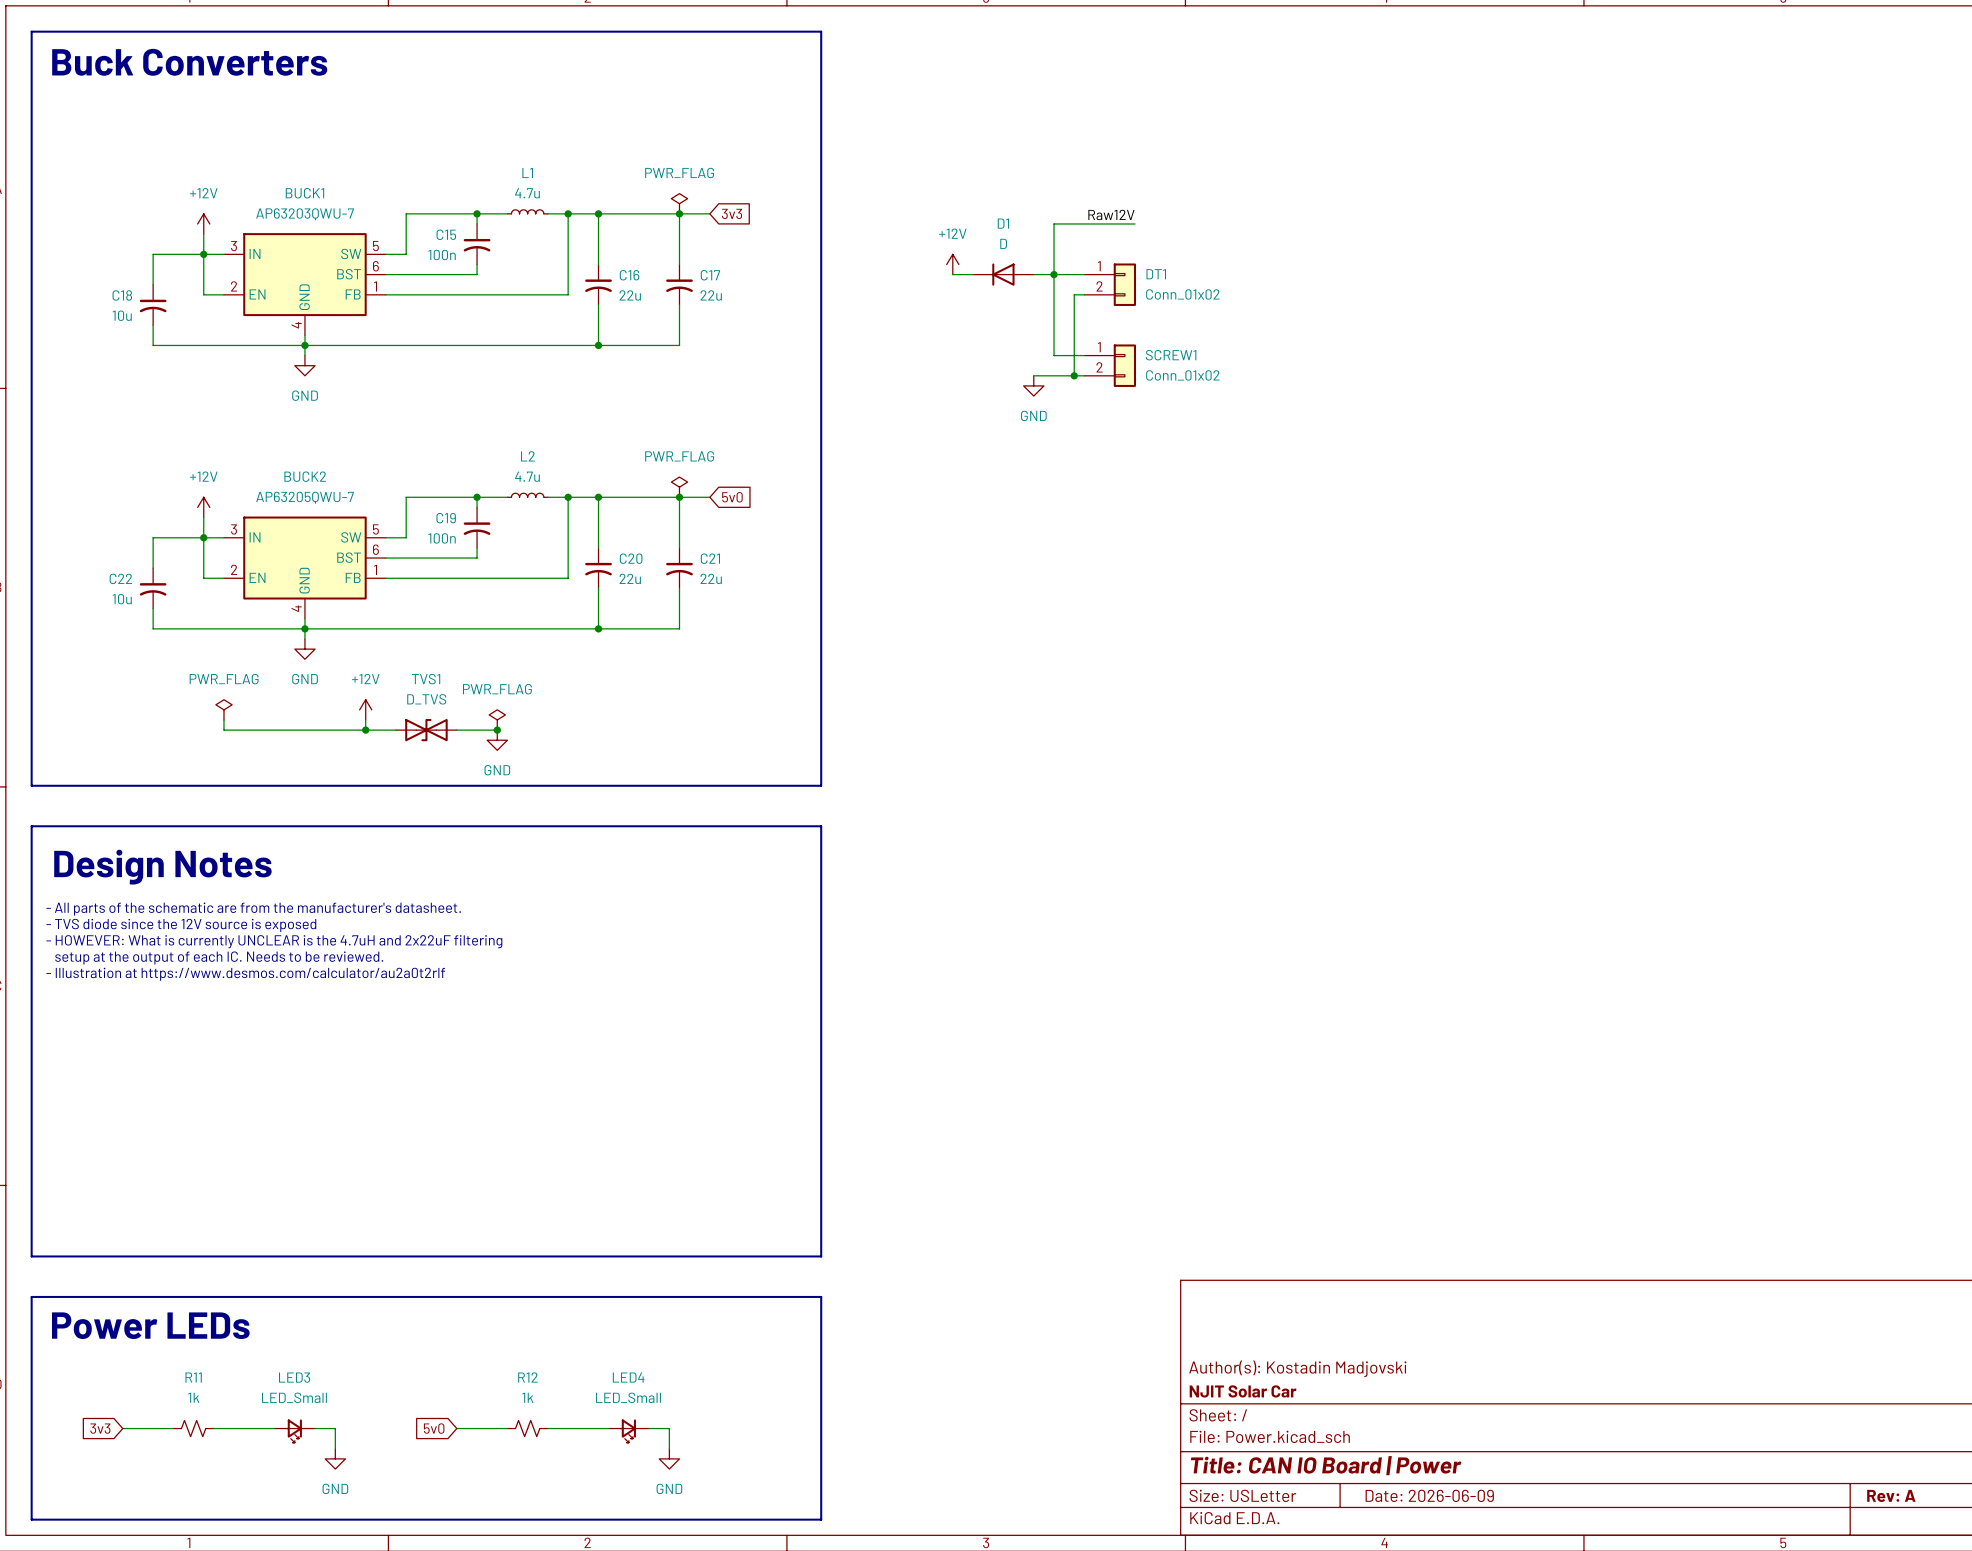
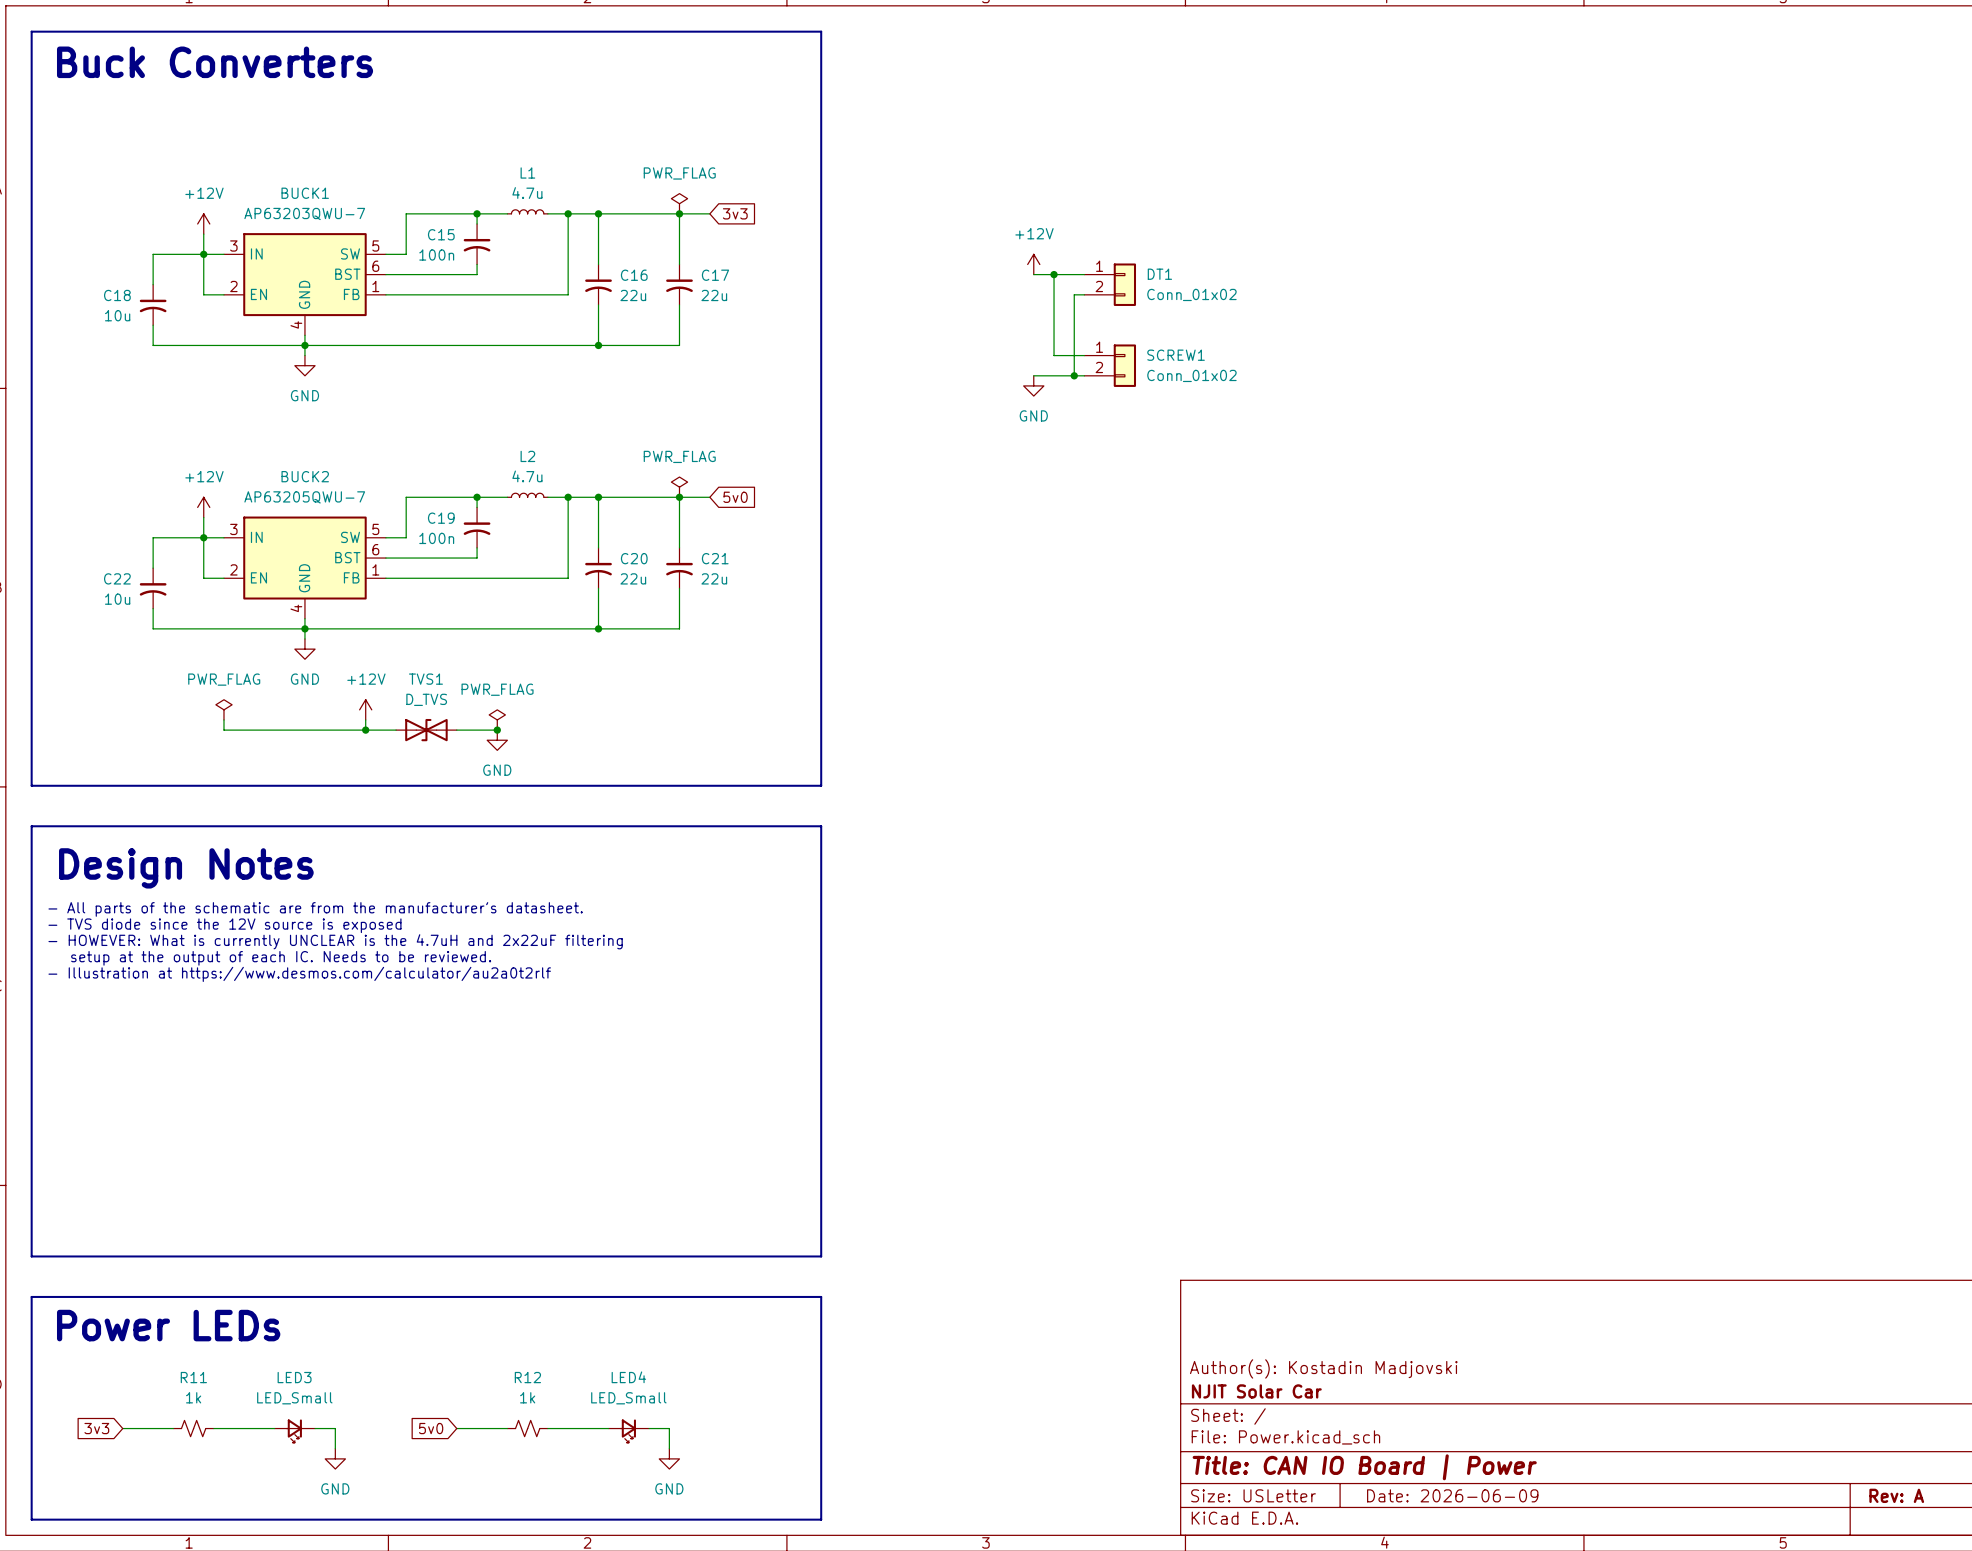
label: Raw12V (1111, 214) -> none
wire: (1134, 223) (1054, 223) (1054, 274) -> none
power symbol position: +12V (952, 264) -> +12V (1033, 264)
wire: (952, 274) (973, 274) -> none
D1: D (1003, 274) -> none

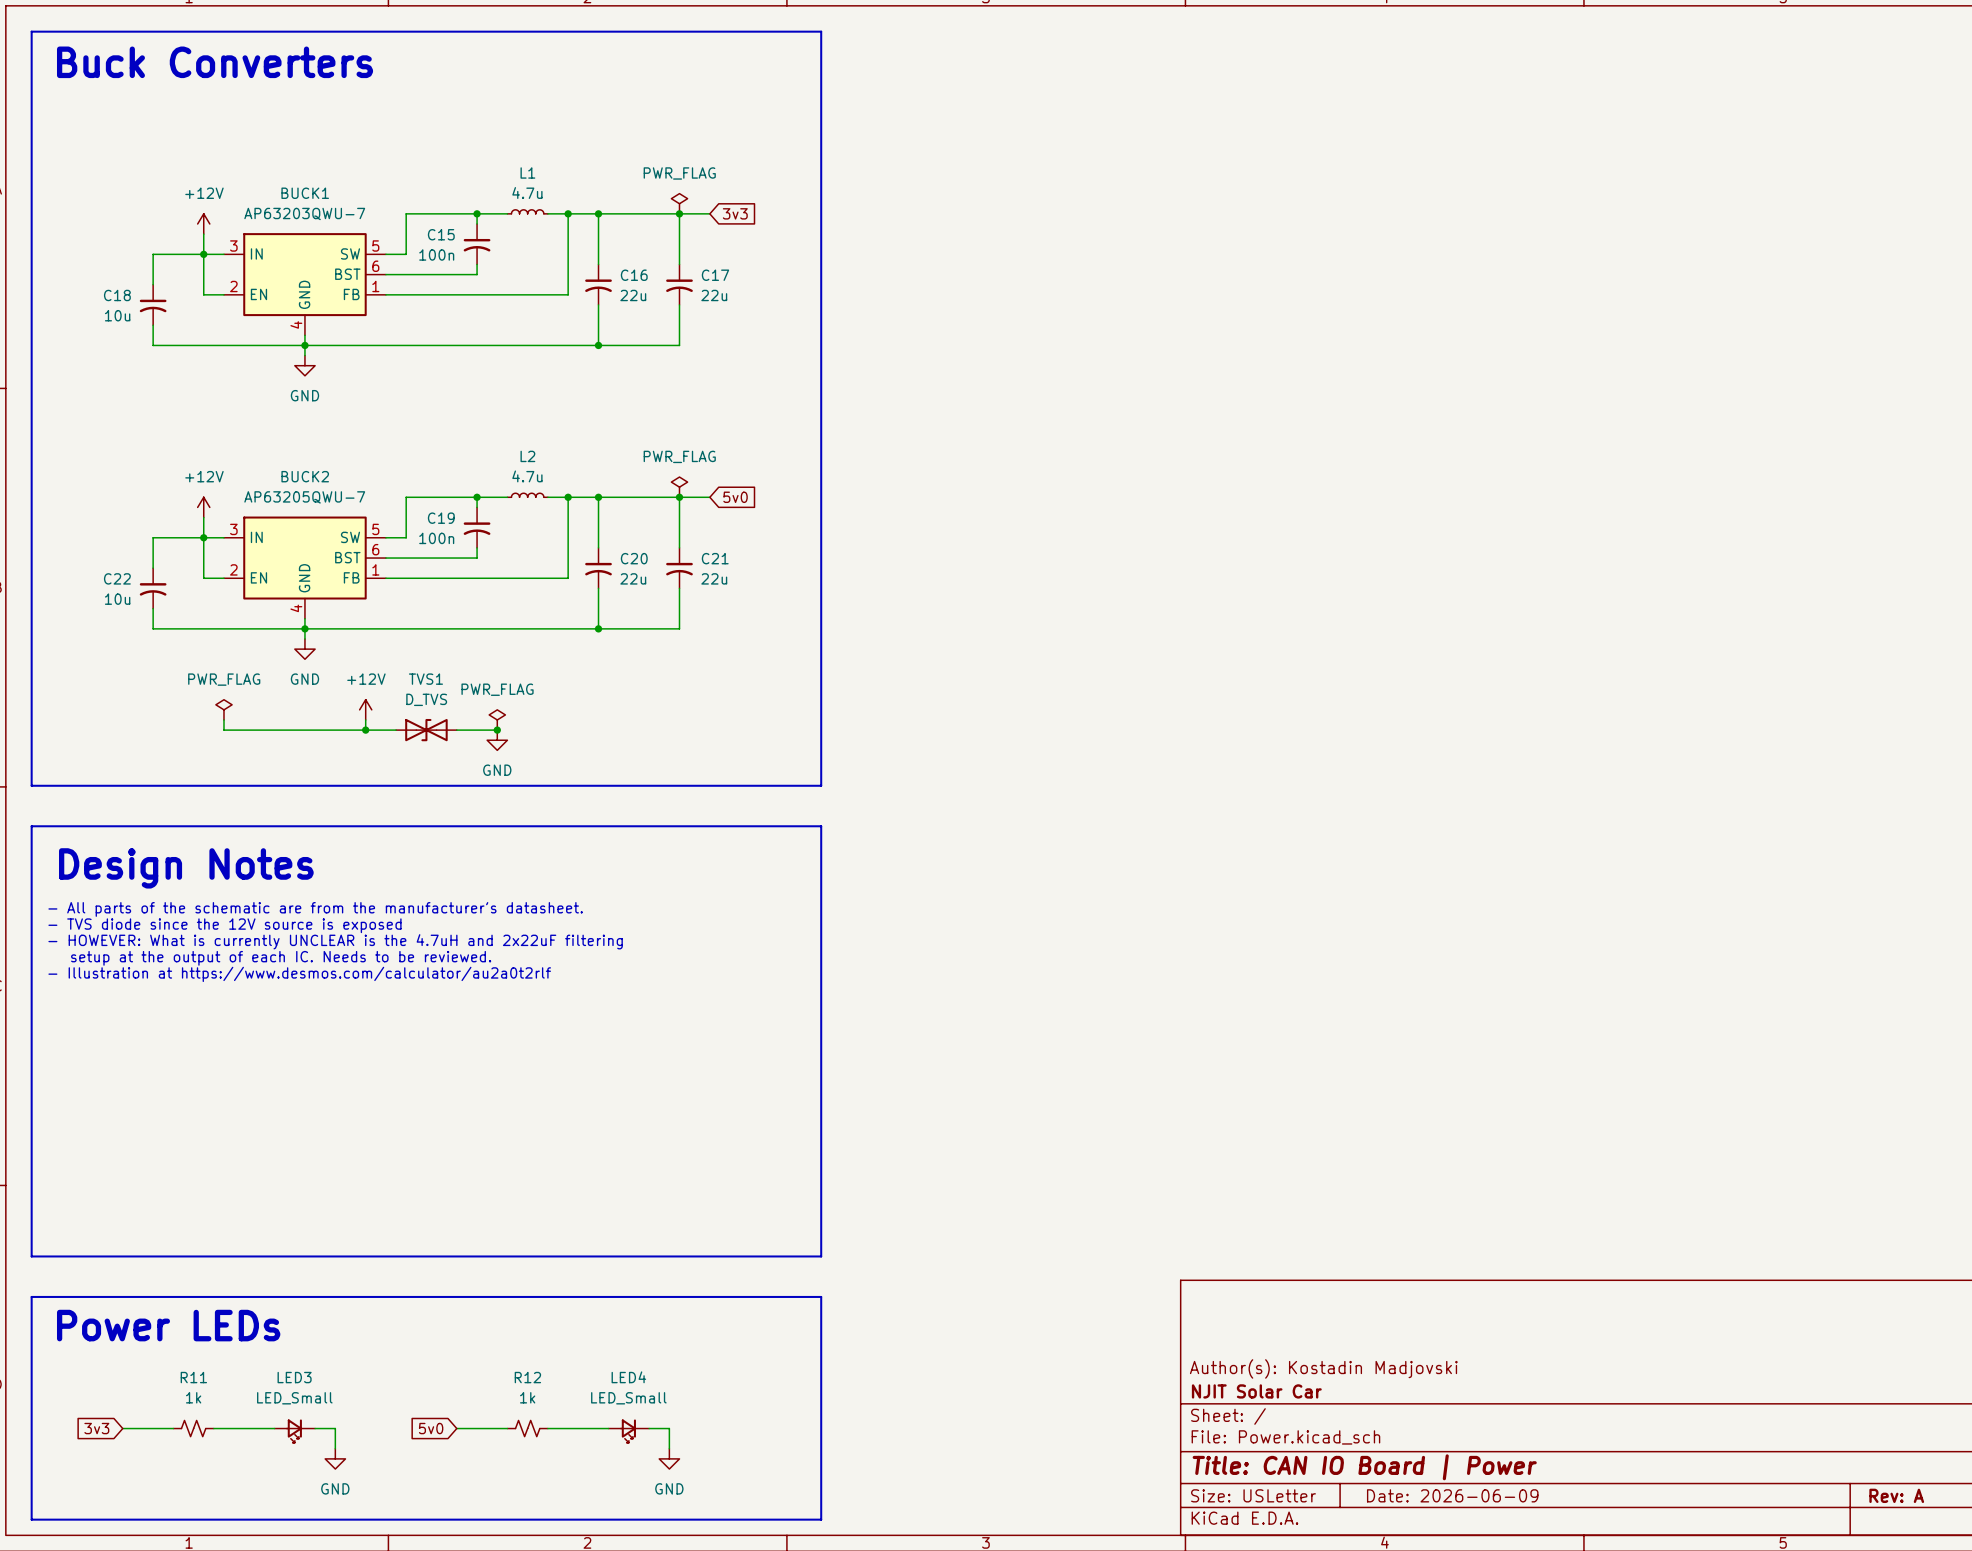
power symbol: +12V (1033, 264) -> none
wire: (1033, 274) (1084, 274) -> none
wire: (1054, 274) (1054, 355) (1084, 355) -> none
junction: (1054, 274) -> none
DT1: Conn_01x02 (1110, 284) -> none
wire: (1084, 294) (1074, 294) (1074, 375) -> none
SCREW1: Conn_01x02 (1110, 365) -> none
wire: (1033, 375) (1084, 375) -> none
junction: (1074, 375) -> none
power symbol: GND (1033, 385) -> none

